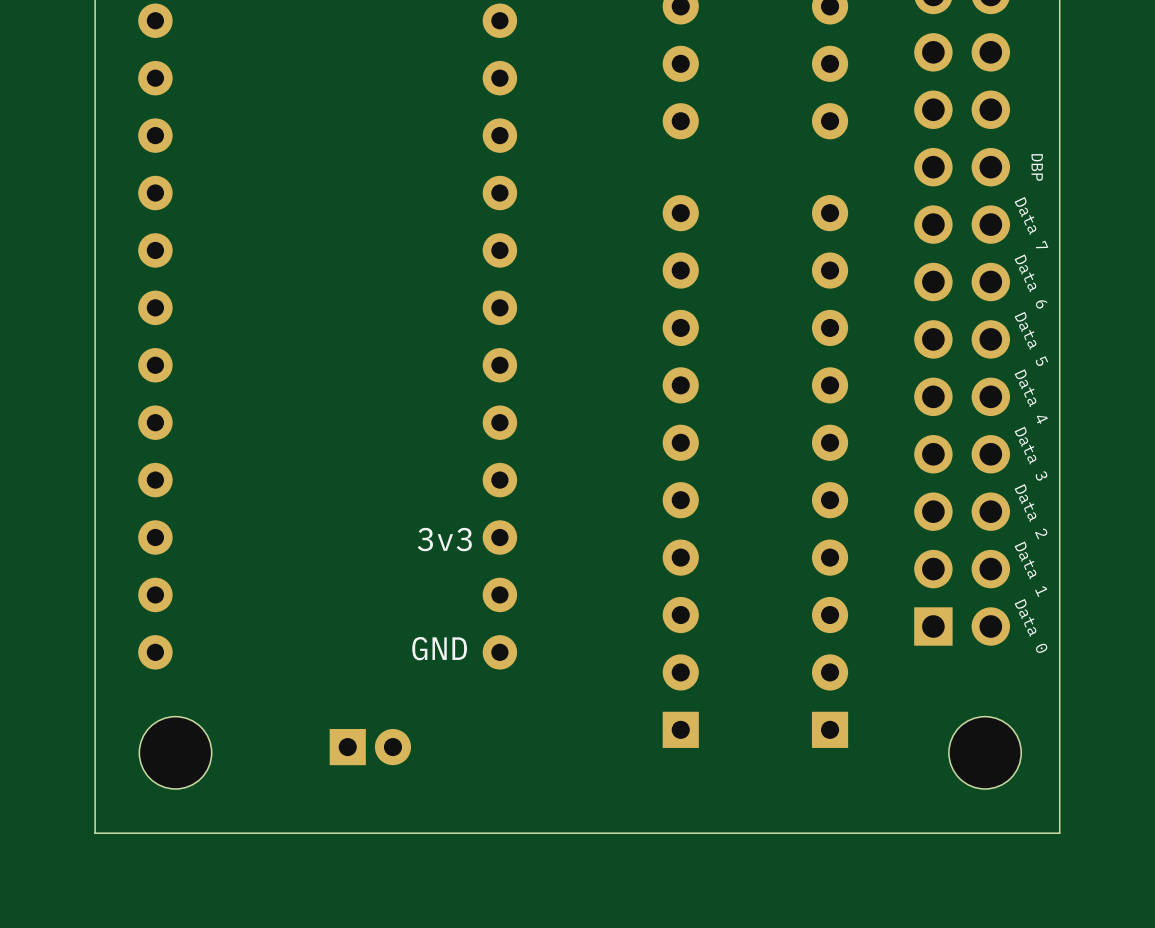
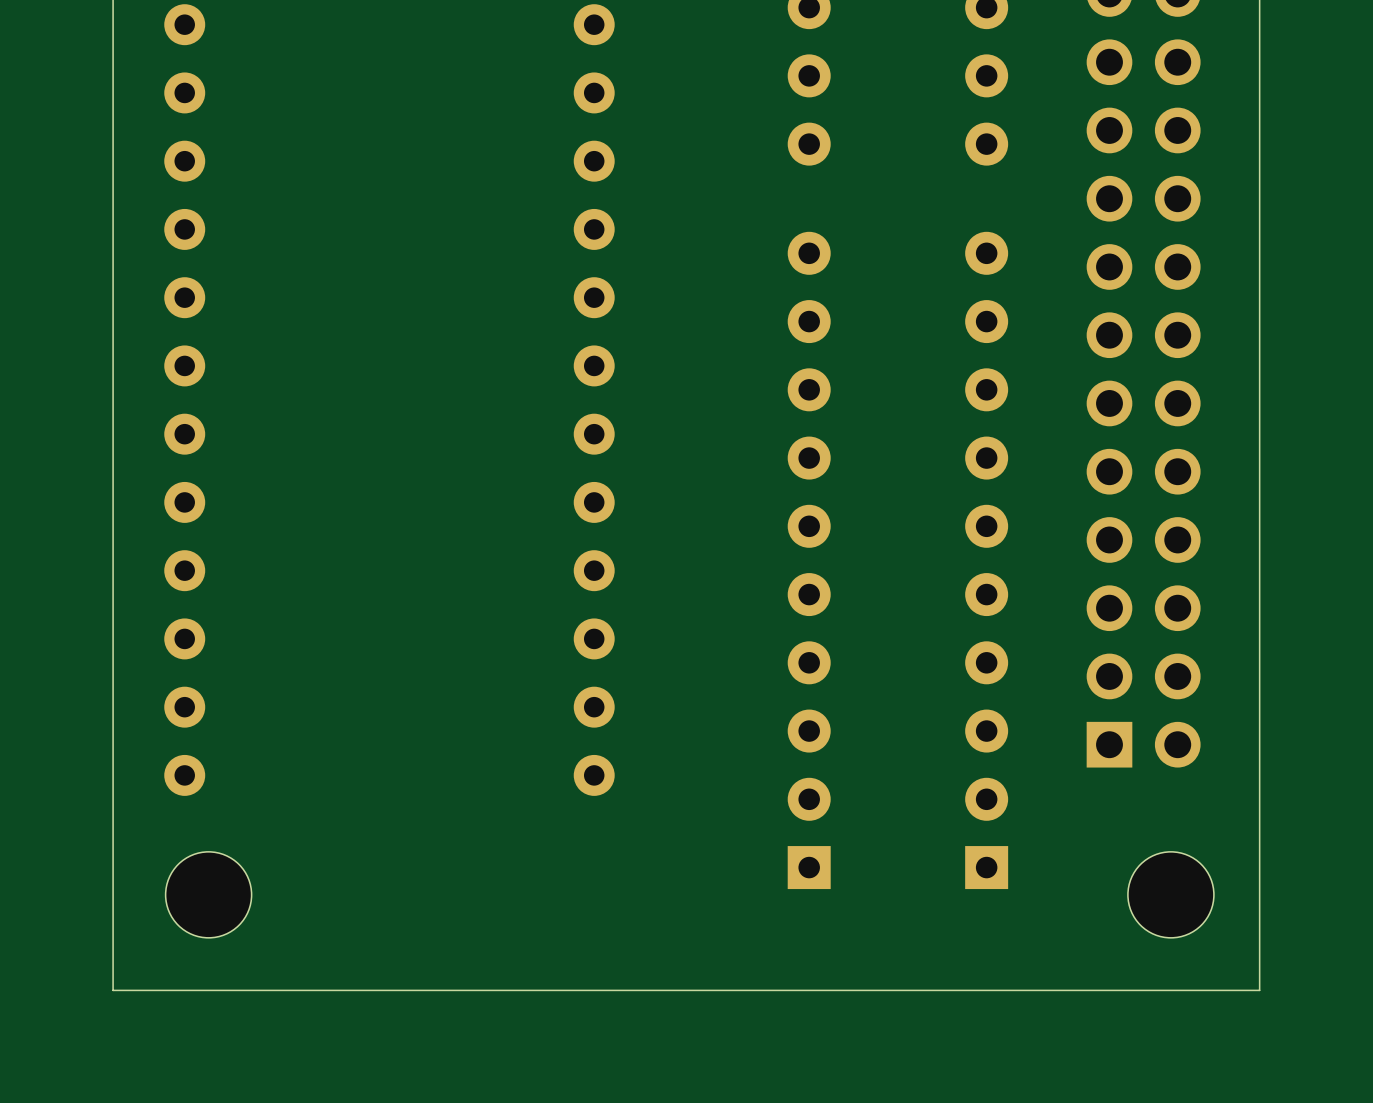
text: DBP (1037, 167) -> none
text: Data 7 (1031, 222) -> none
text: Data 6 (1031, 281) -> none
text: Data 5 (1031, 338) -> none
text: Data 4 (1031, 396) -> none
text: Data 3 (1030, 453) -> none
text: Data 2 (1030, 511) -> none
text: 3v3 (444, 539) -> none
text: Data 1 (1030, 569) -> none
text: Data 0 (1030, 625) -> none
text: GND (439, 648) -> none
part: (370, 747) -> none

